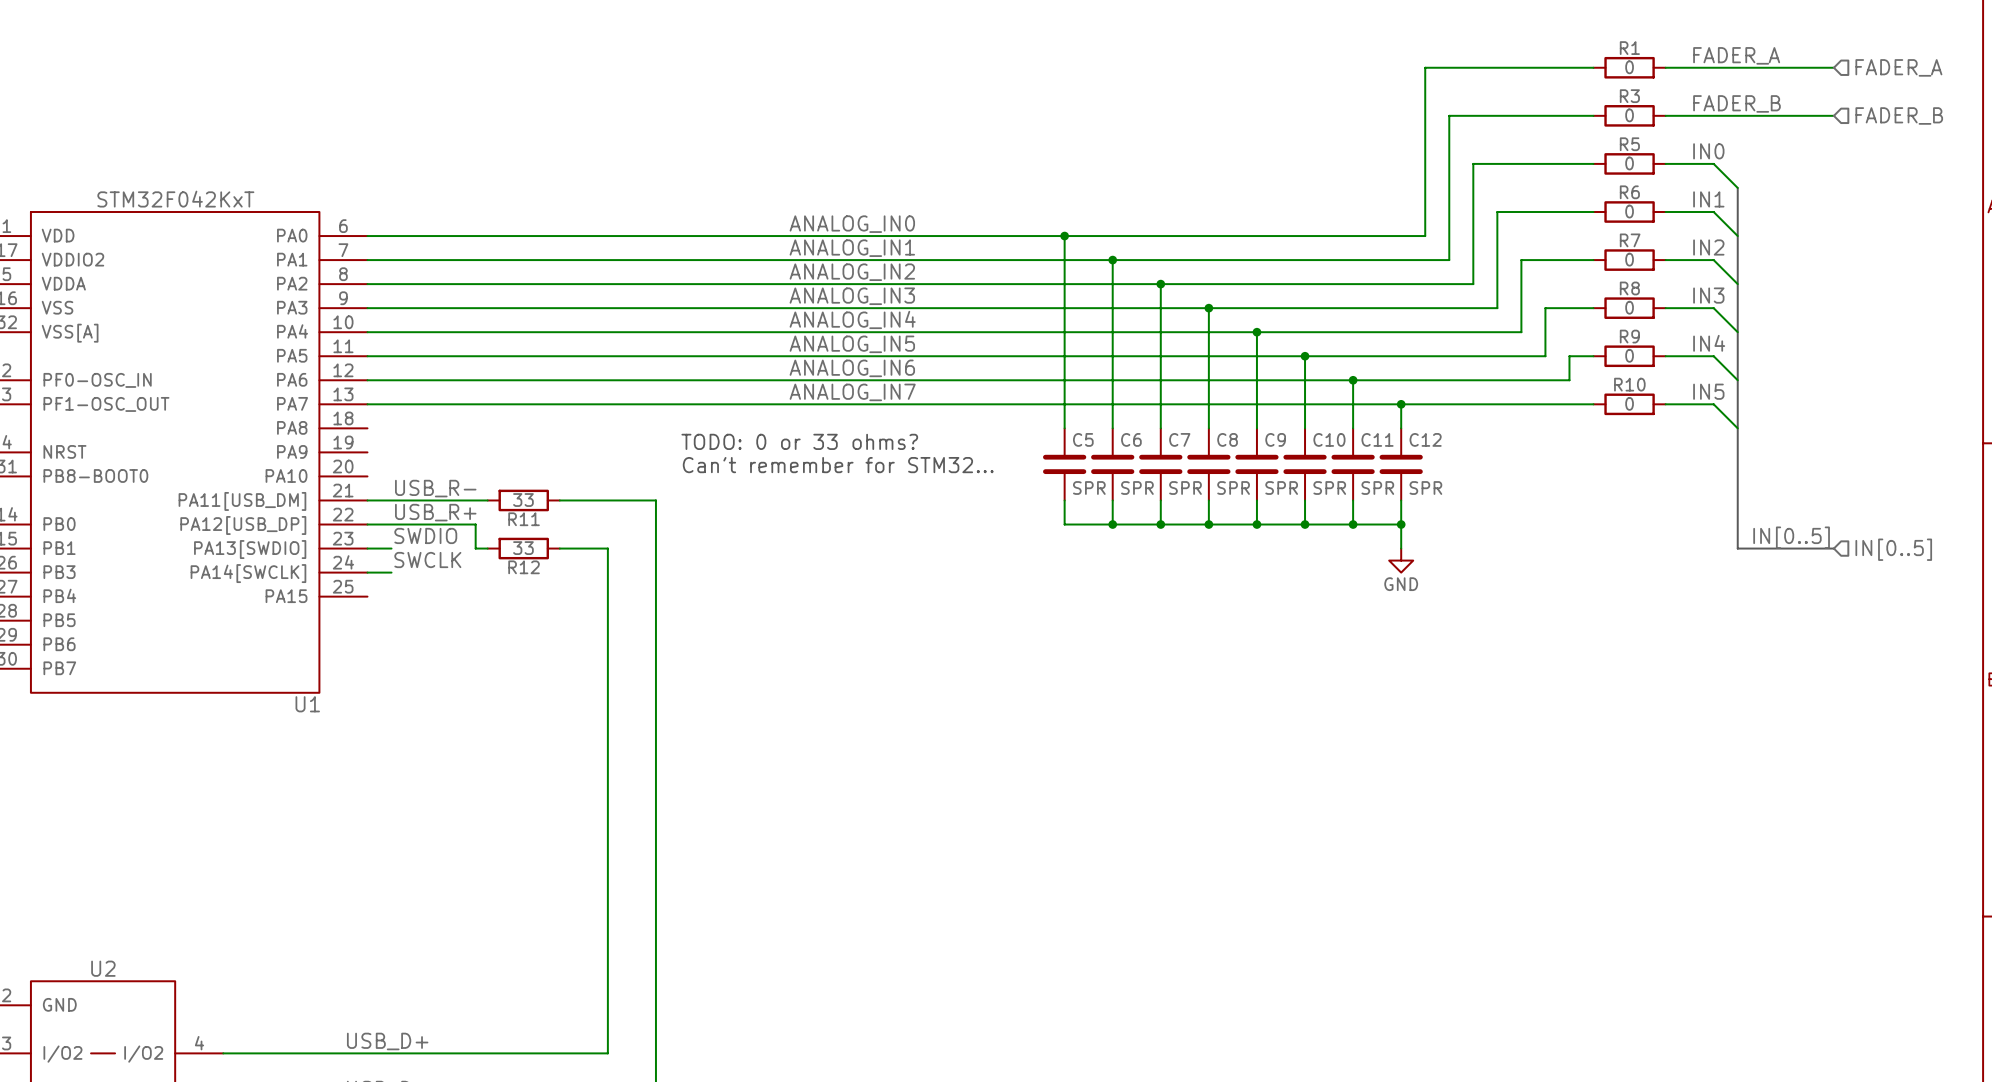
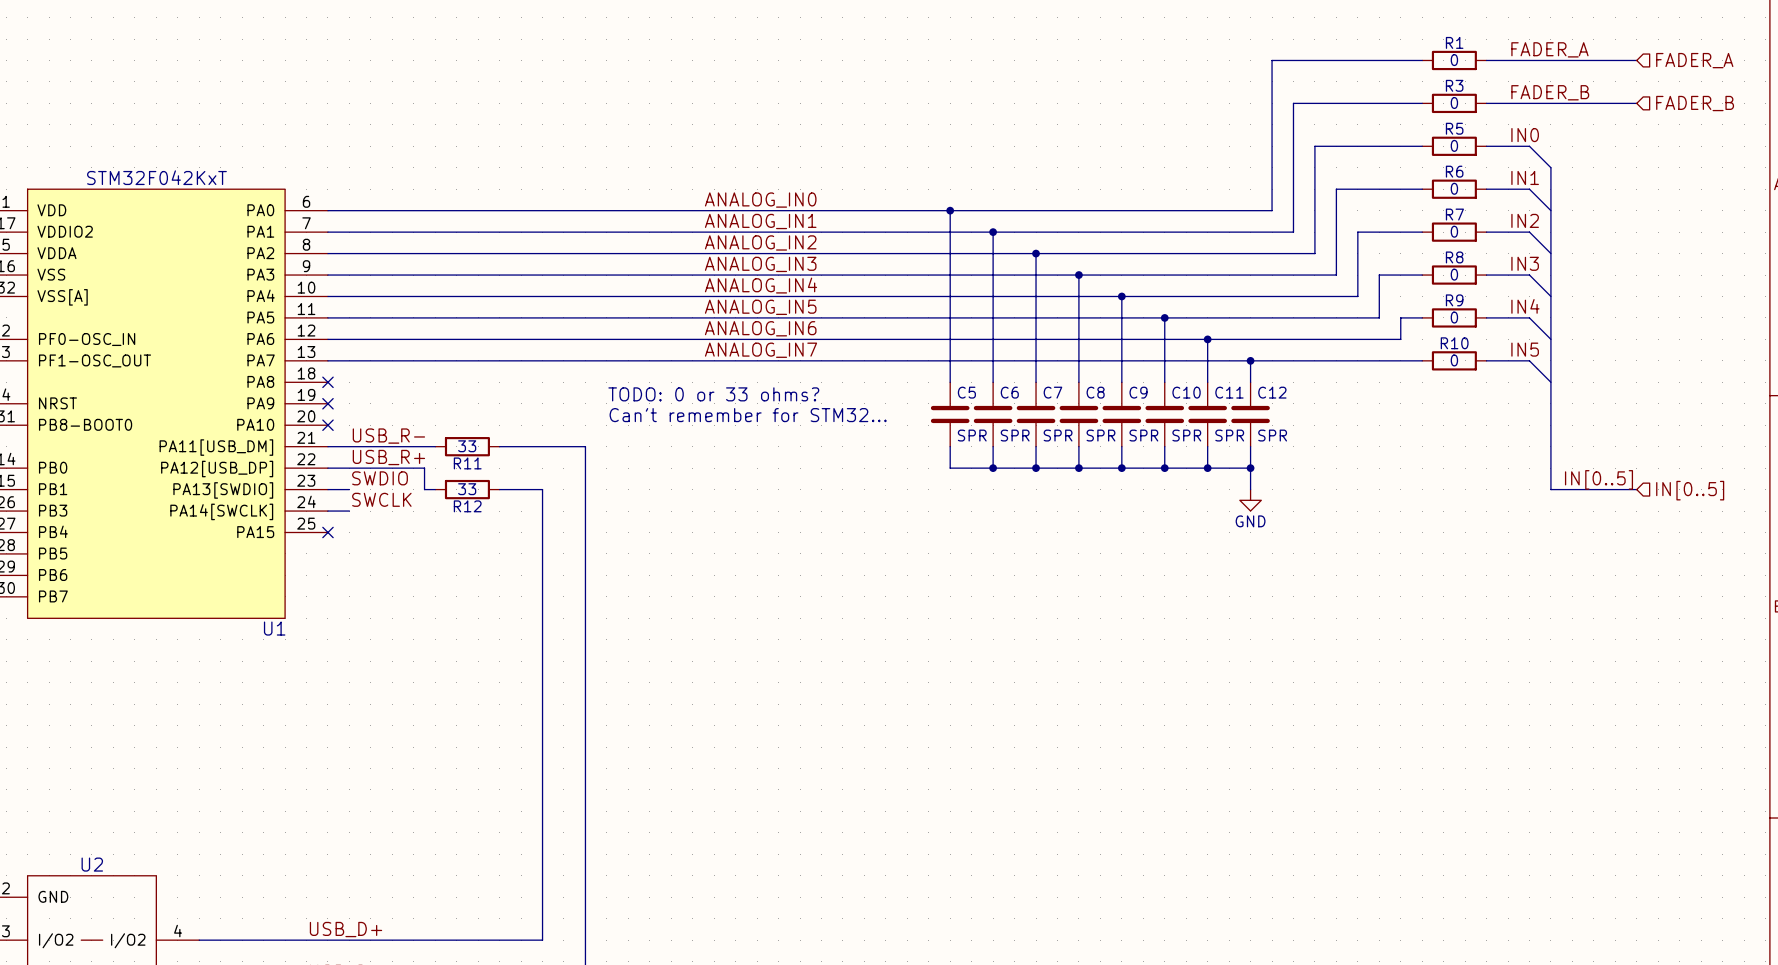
no-connect mark: none -> (327, 382)
no-connect mark: none -> (327, 403)
no-connect mark: none -> (327, 425)
no-connect mark: none -> (327, 532)

